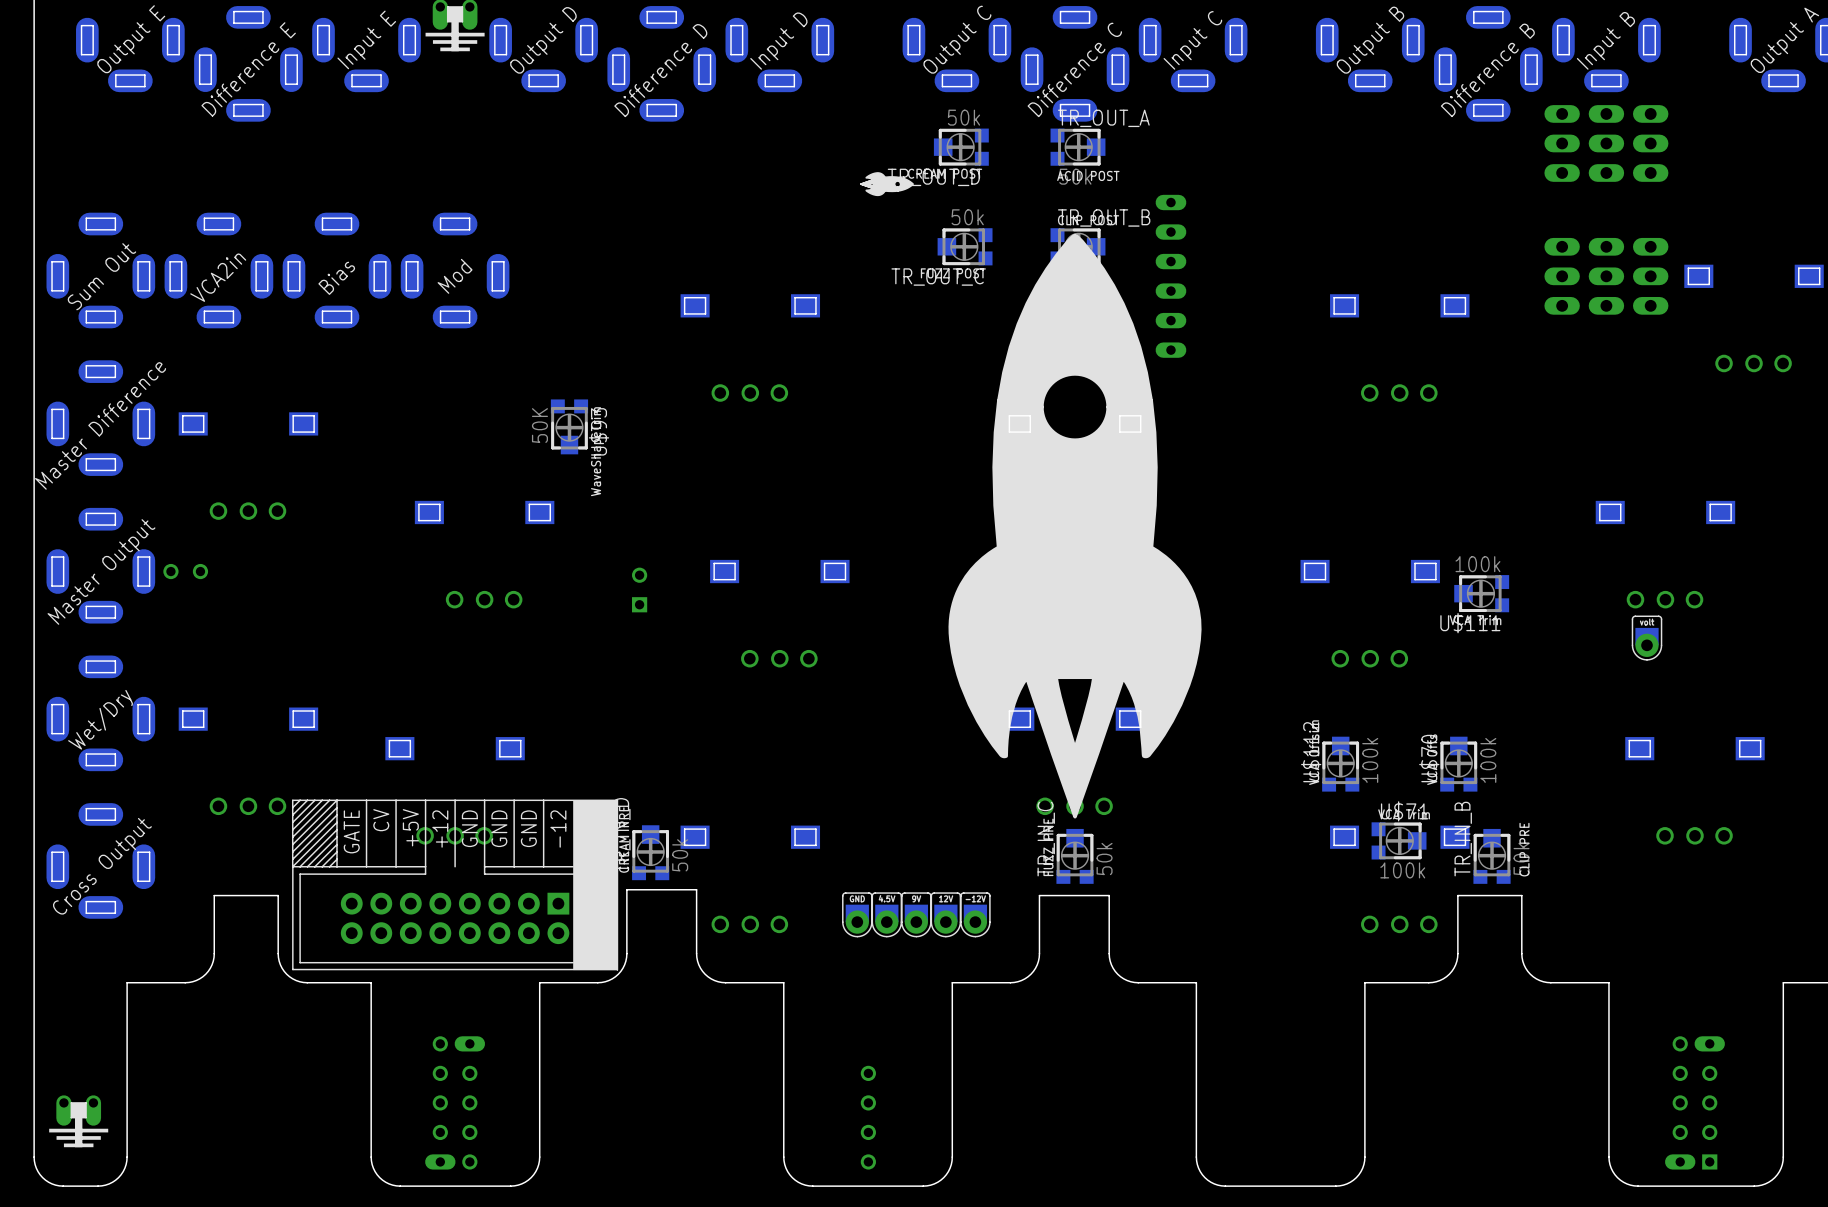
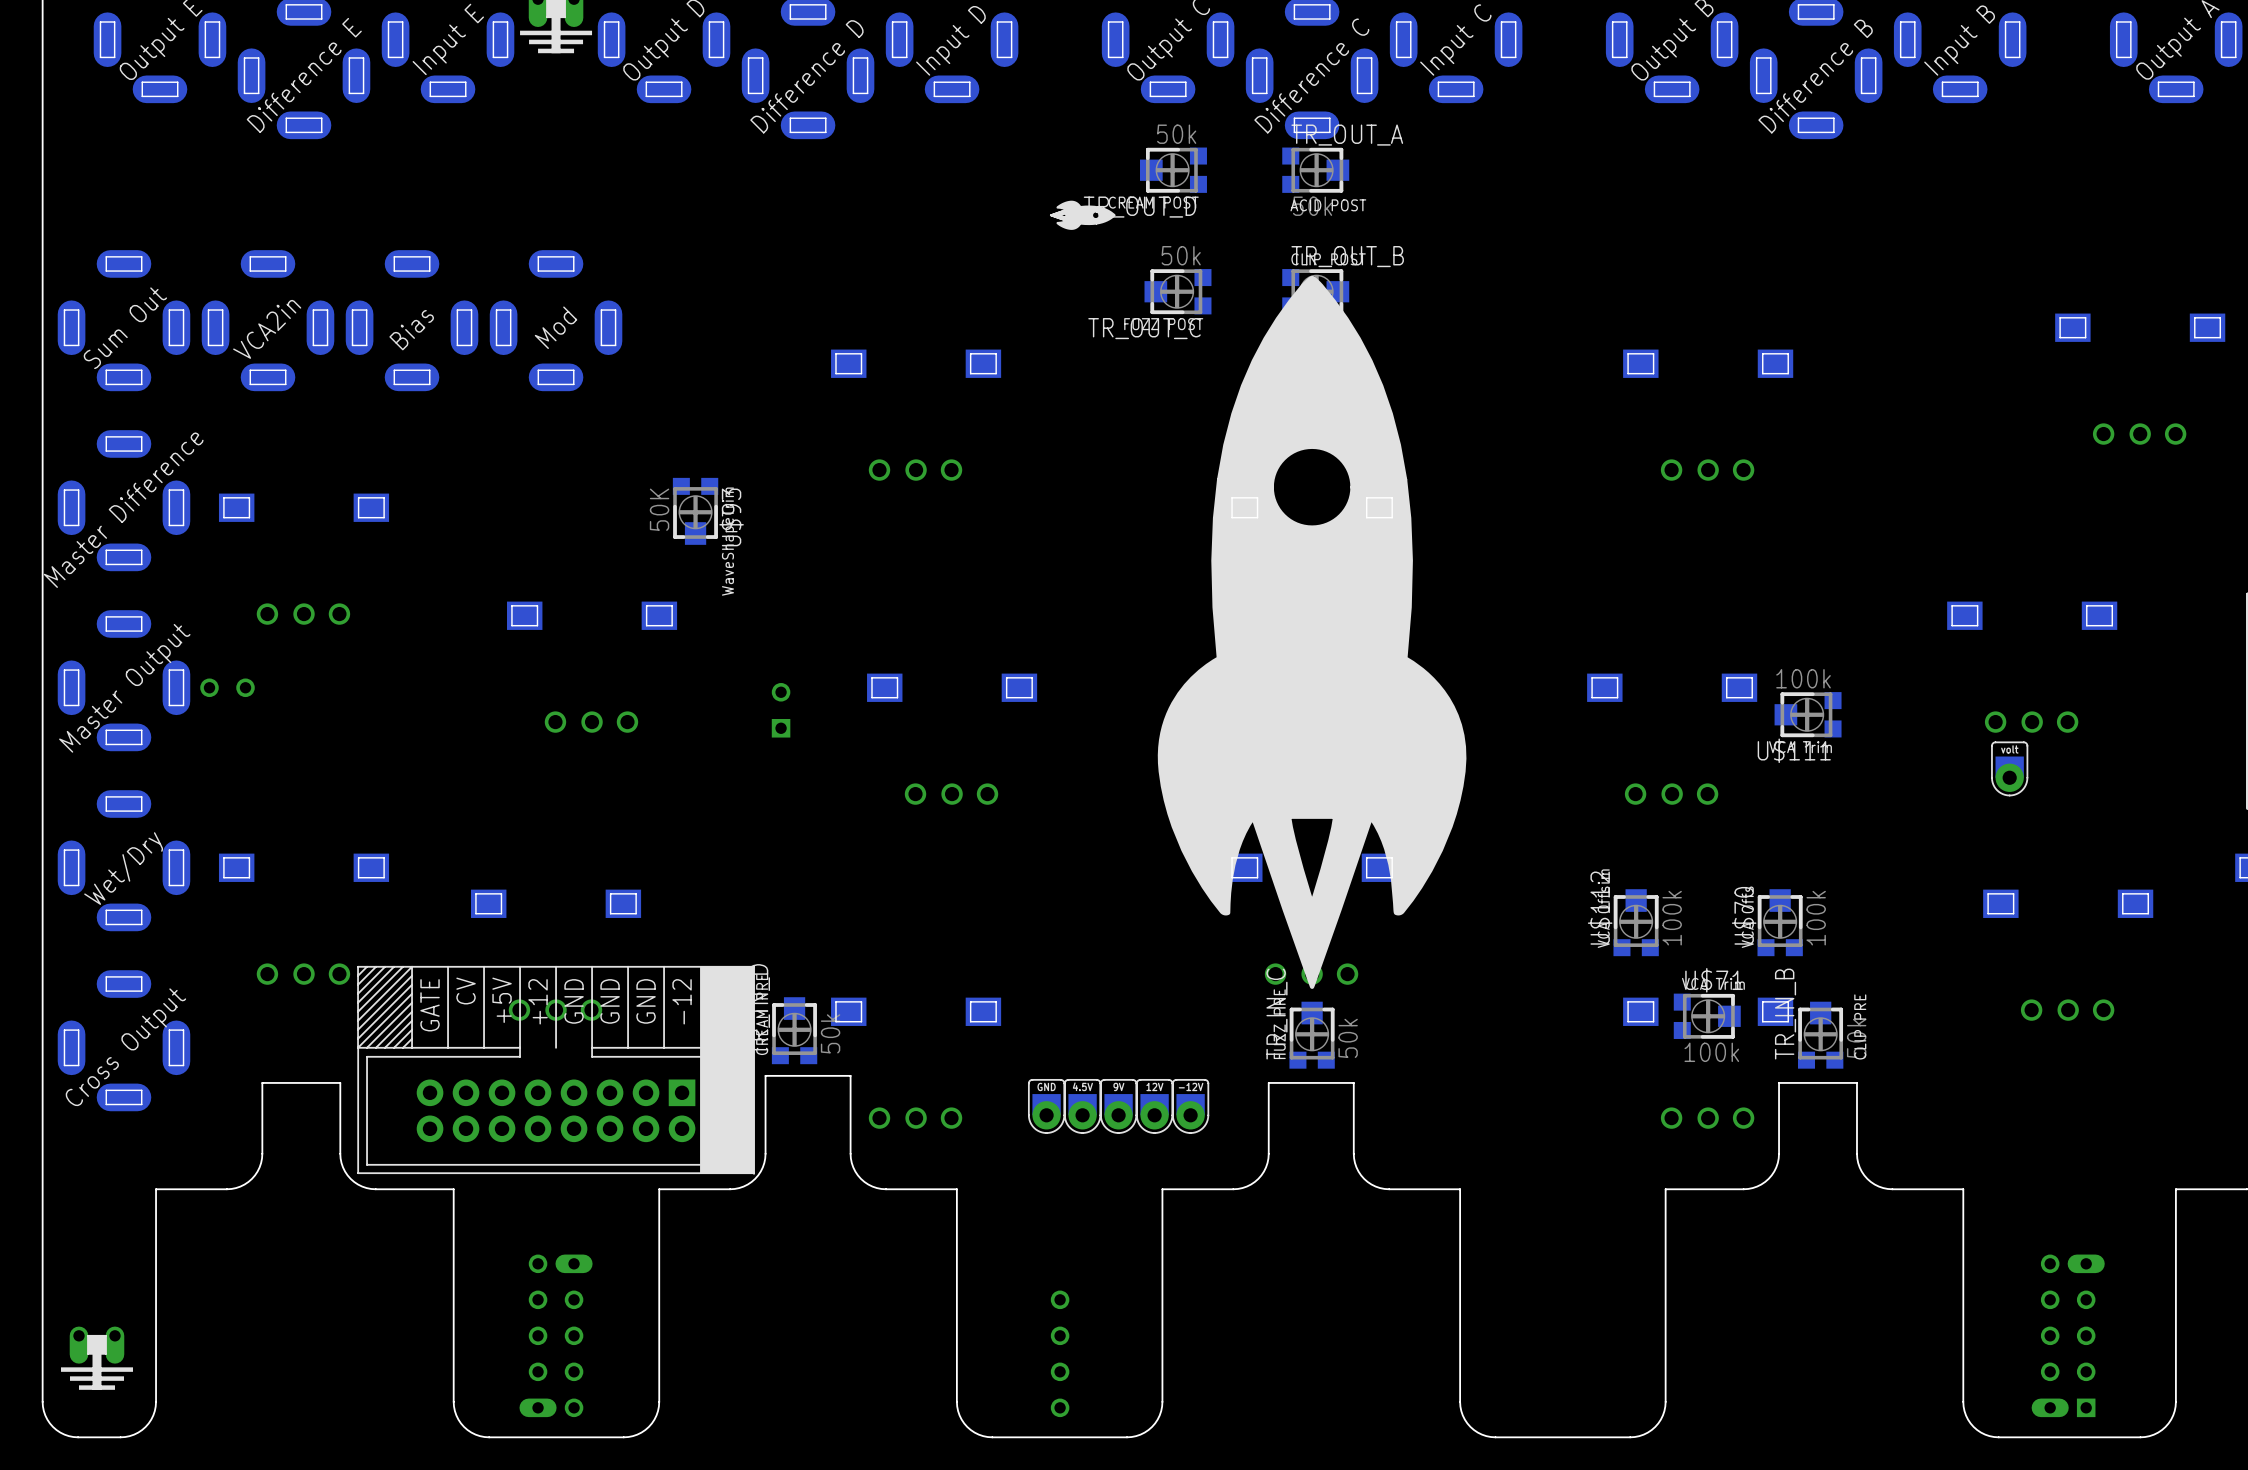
part: (1562, 143) -> none
part: (1606, 143) -> none
part: (1650, 143) -> none
part: (1170, 232) -> none
part: (1562, 276) -> none
part: (1606, 276) -> none
part: (1650, 276) -> none
part: (1170, 320) -> none

